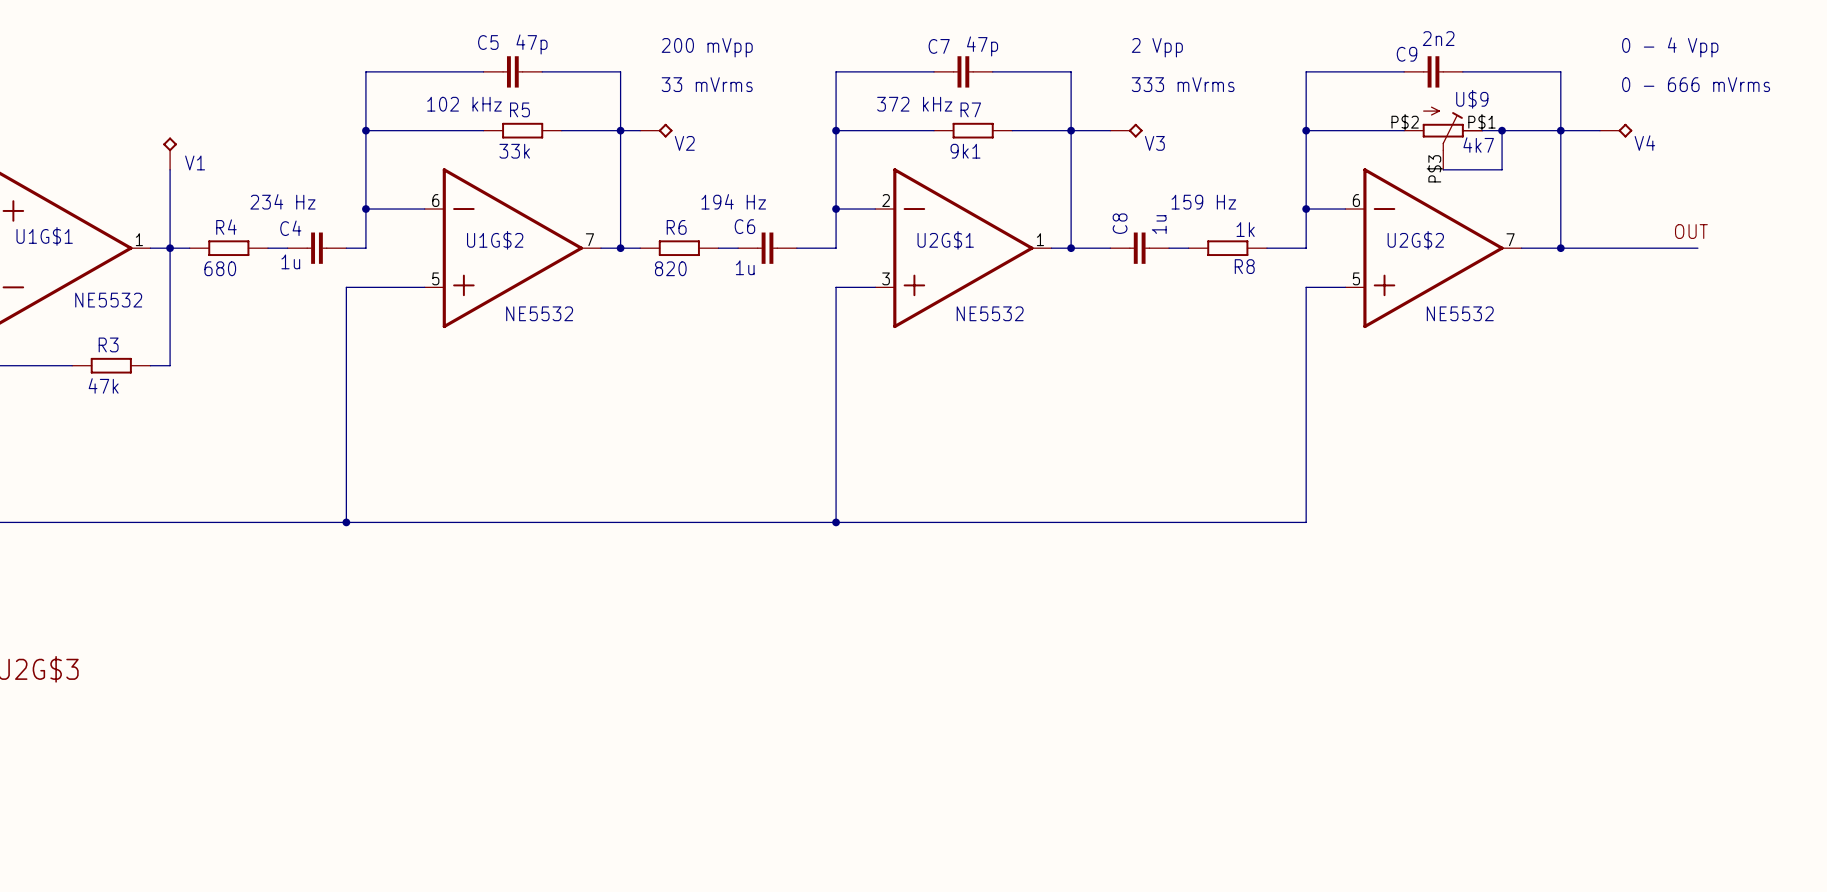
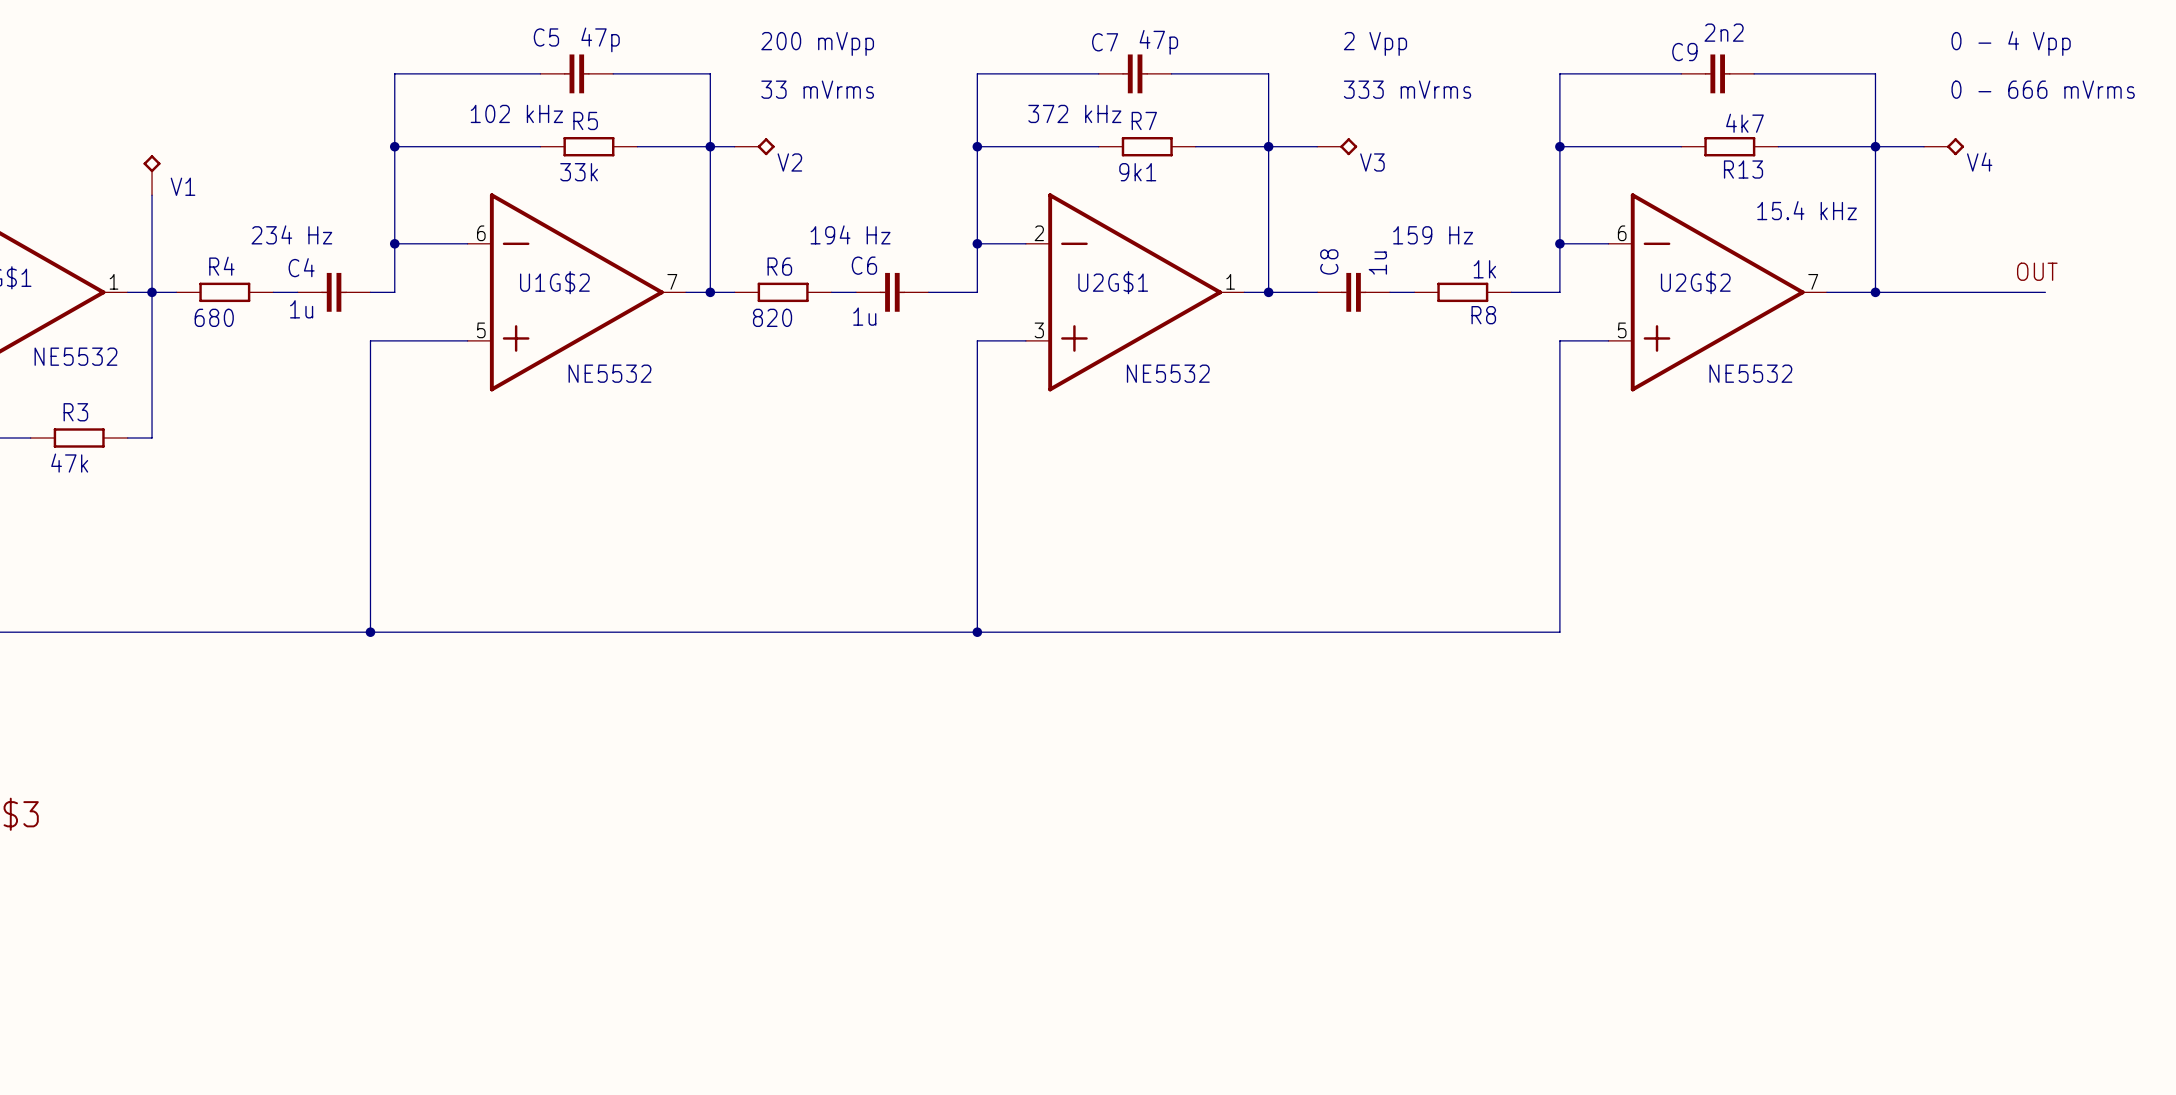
R13: none -> 4k7 (1729, 146)
wire: (1502, 130) (1502, 169) (1443, 169) -> none
junction: (1502, 130) -> none
U$9: 4k7 (1443, 138) -> none
text: none -> 15.4 kHz (1807, 210)

